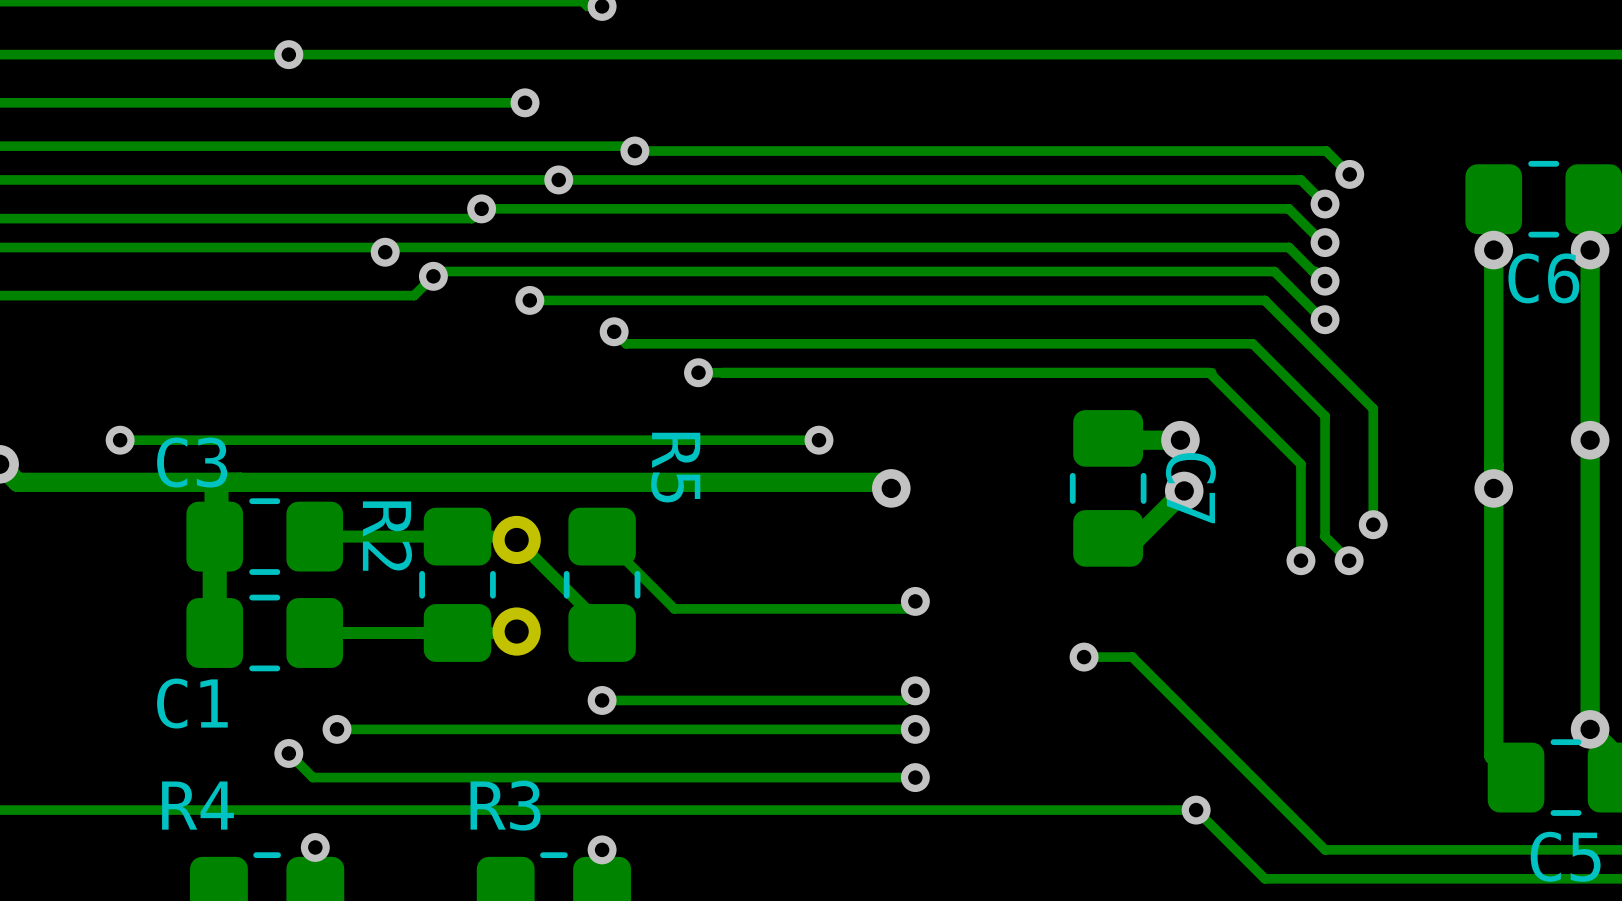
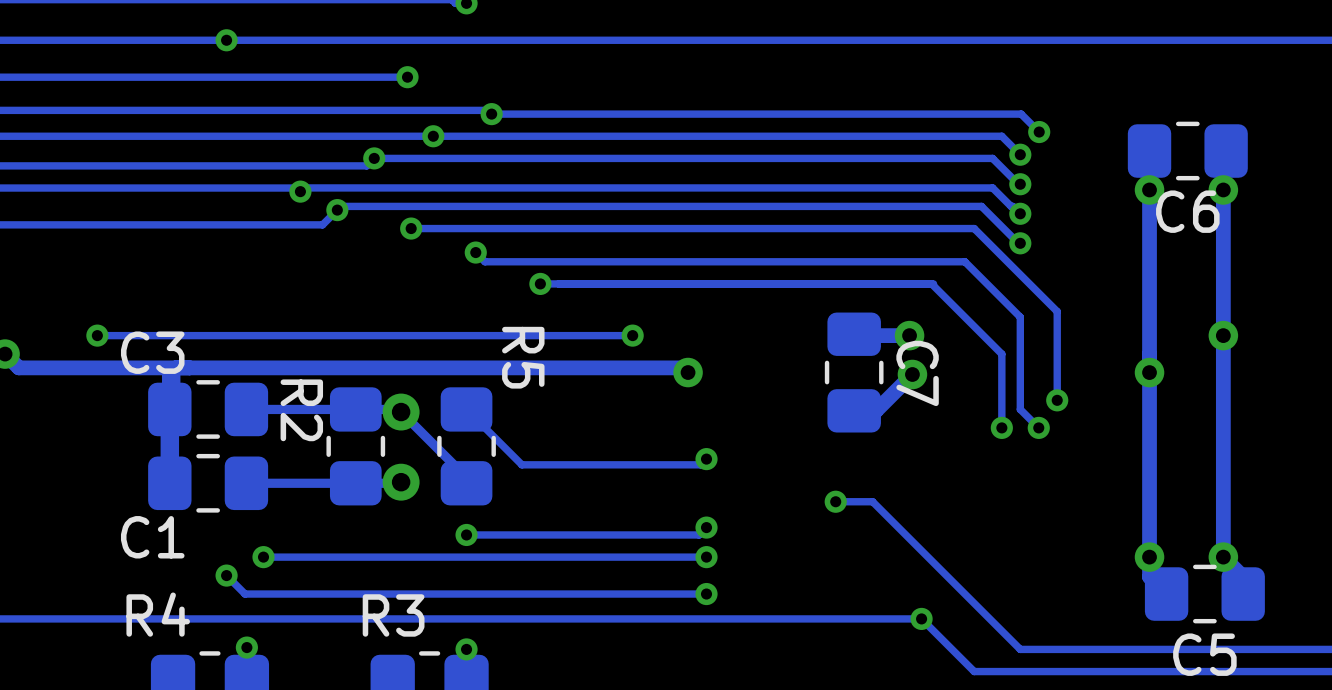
via: none -> (1149, 557)

